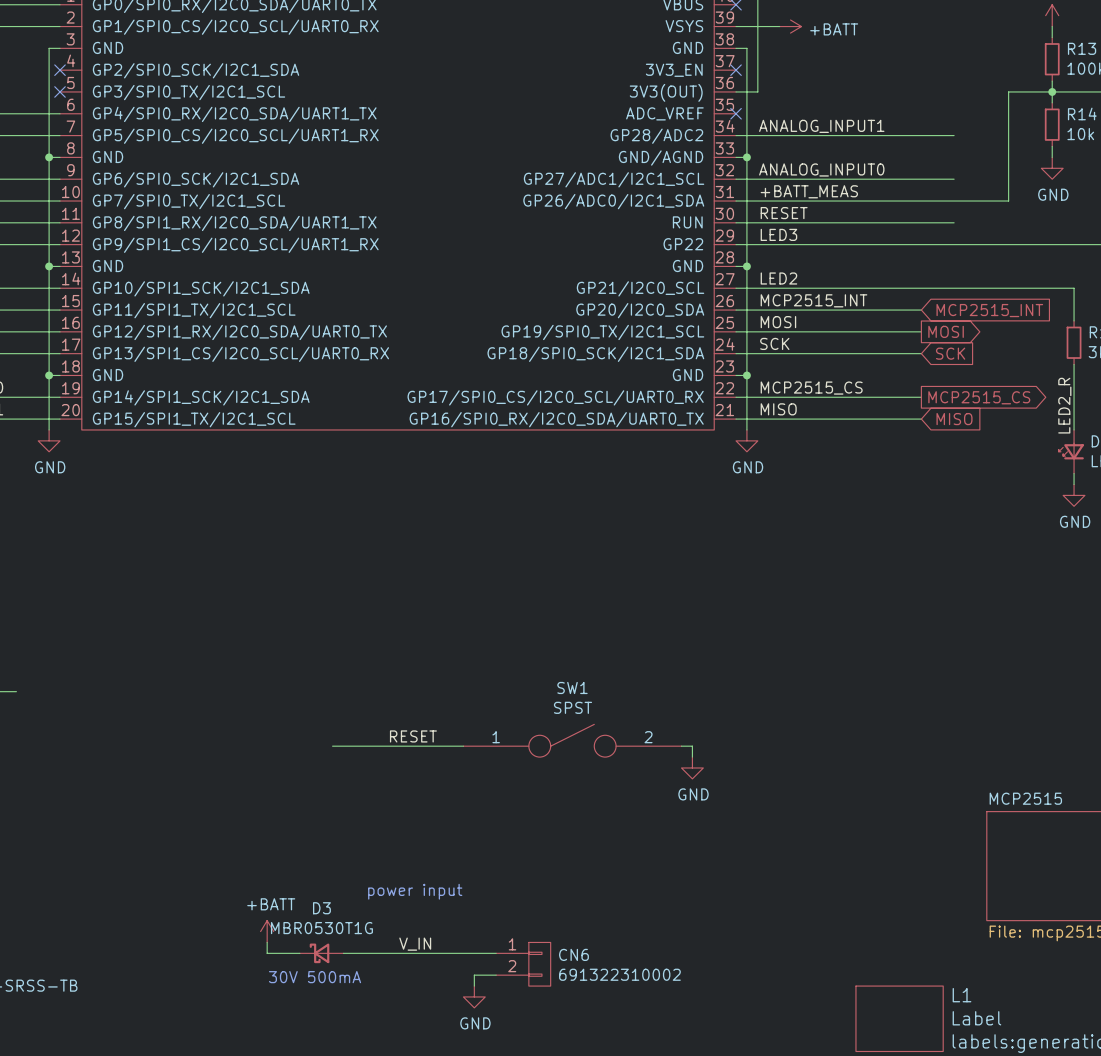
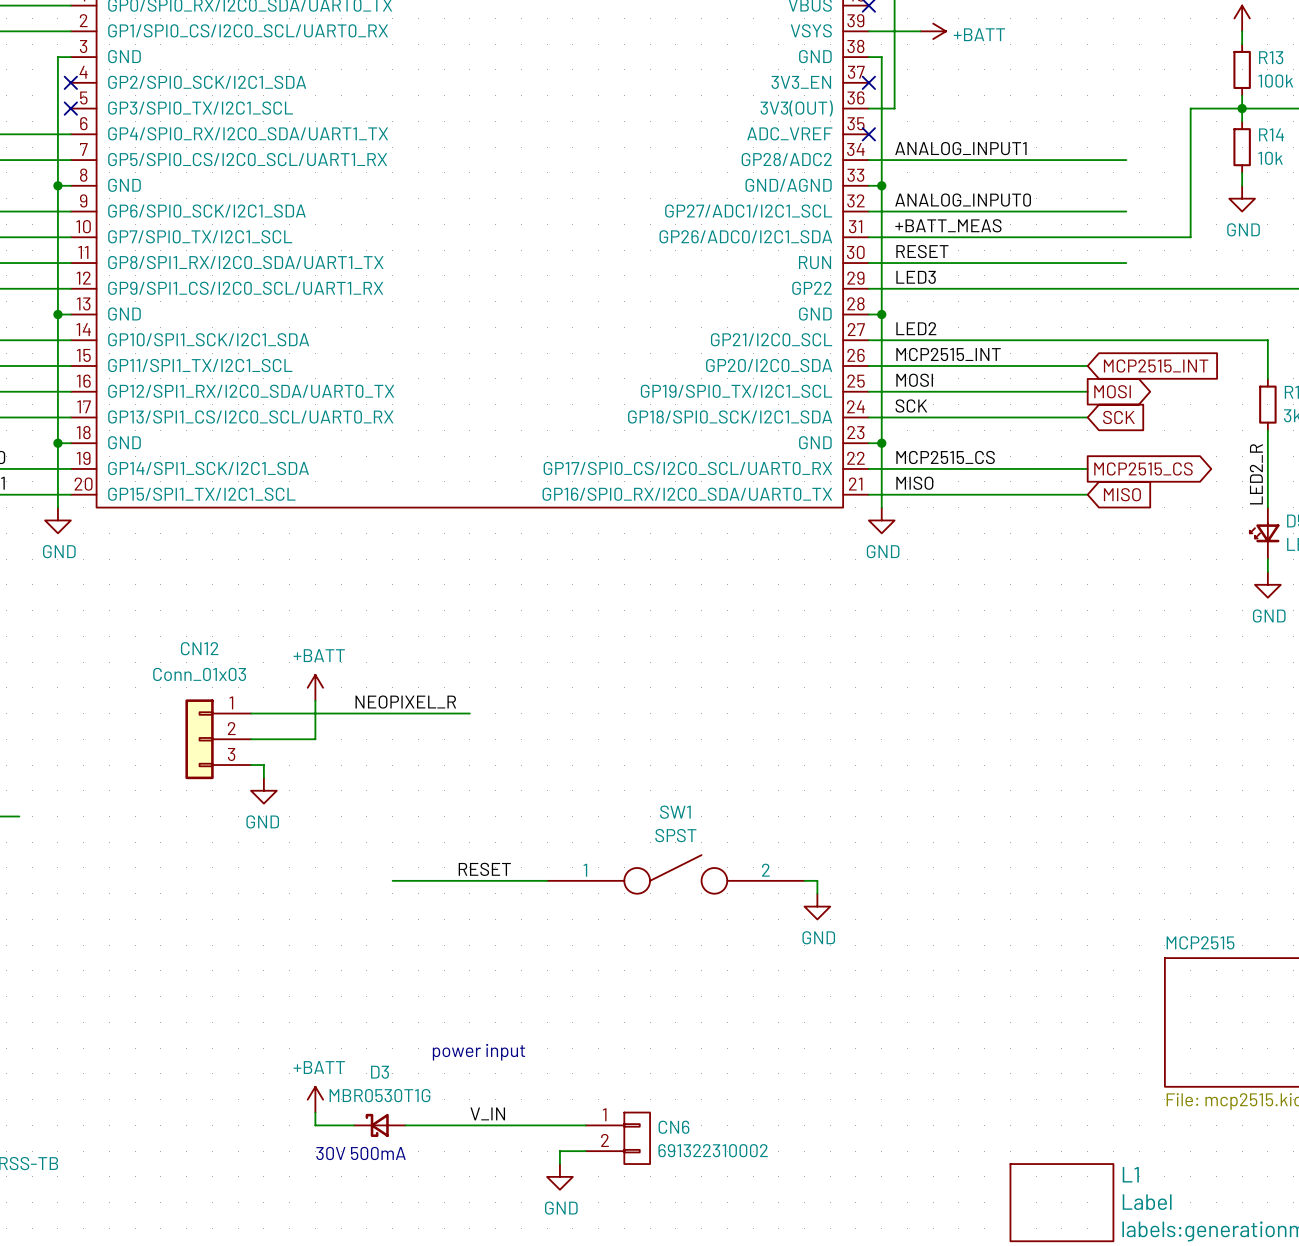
power symbol: none -> +BATT (315, 687)
wire: none -> (315, 700) (315, 739) (251, 739)
label: none -> NEOPIXEL_R (405, 702)
wire: none -> (251, 713) (469, 713)
CN12: none -> Conn_01x03 (218, 739)
wire: none -> (251, 765) (263, 765) (263, 777)
power symbol: none -> GND (263, 790)

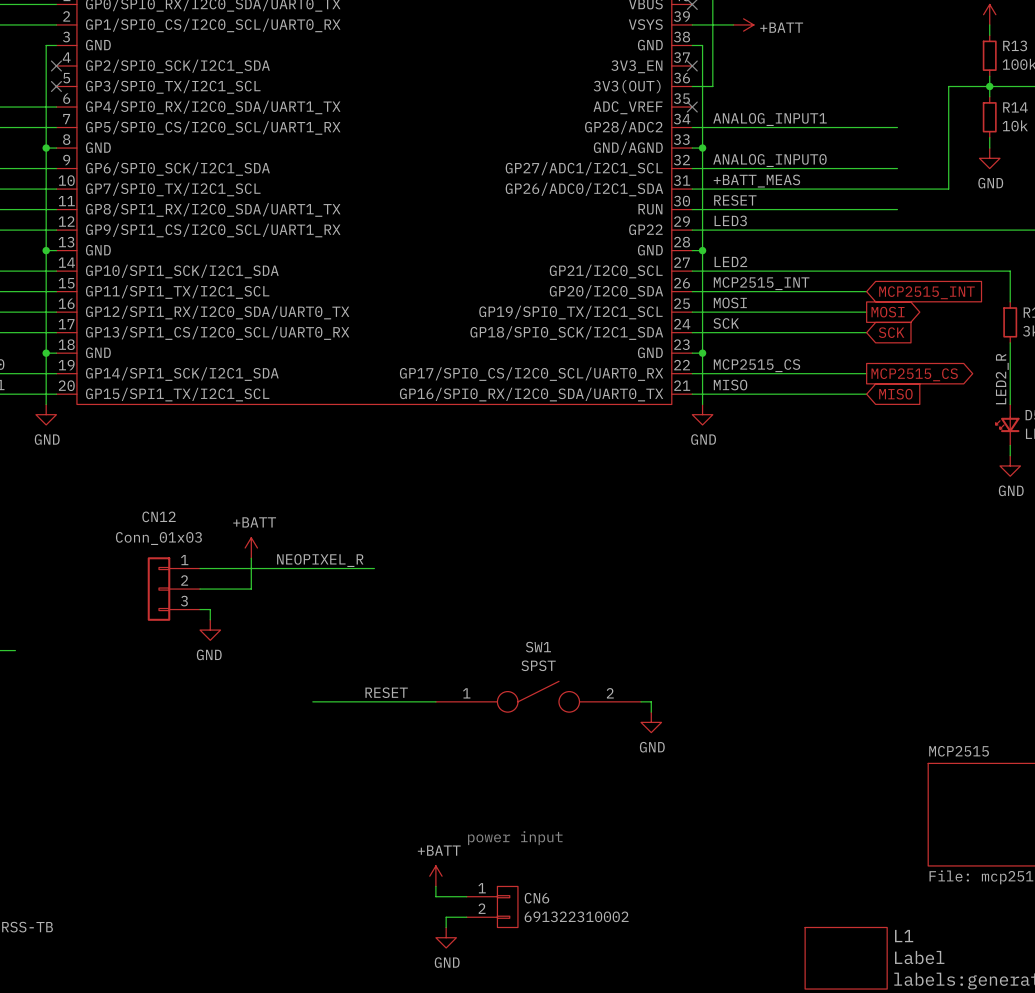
text position: power input (478, 1052) -> power input (515, 838)
power symbol position: +BATT (315, 1099) -> +BATT (435, 876)
wire: (315, 1112) (315, 1125) (354, 1125) -> none
label: V_IN (487, 1113) -> none
D3: MBR0530T1G (379, 1125) -> none
wire: (405, 1125) (547, 1125) -> (435, 886) (435, 896)
text: 30V 500mA (361, 1153) -> none

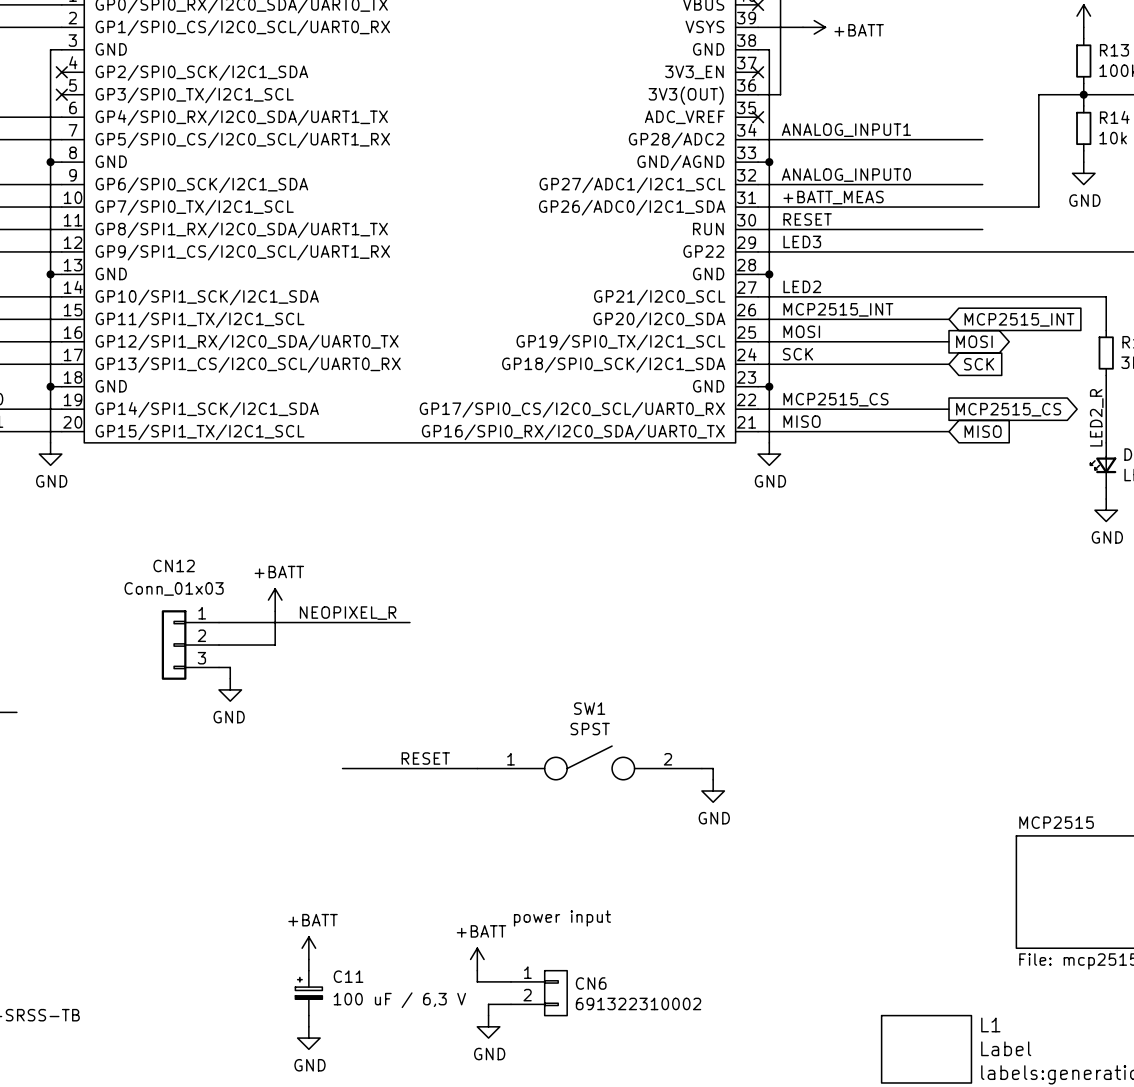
power symbol: none -> +BATT (308, 948)
wire: none -> (308, 959) (308, 970)
C11: none -> 100 uF / 6,3 V (308, 993)
wire: none -> (308, 1015) (308, 1026)
power symbol: none -> GND (308, 1038)

